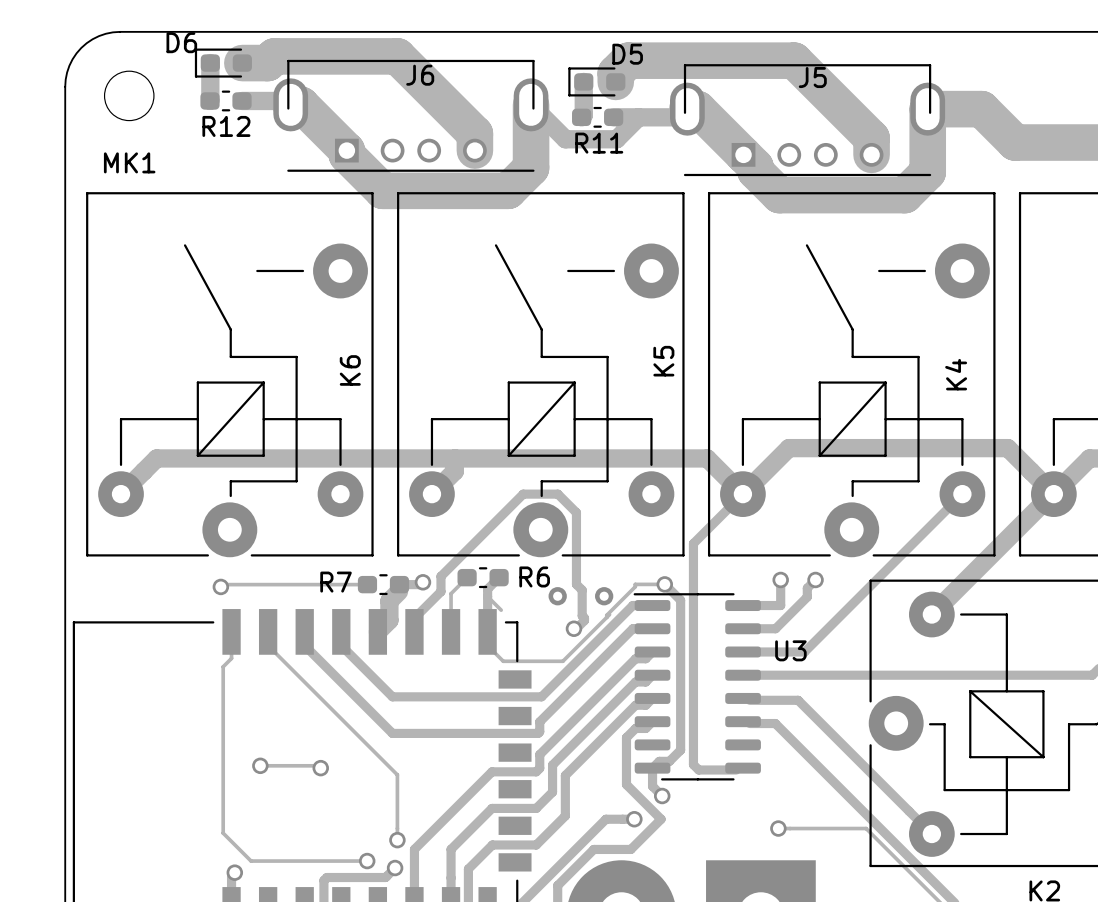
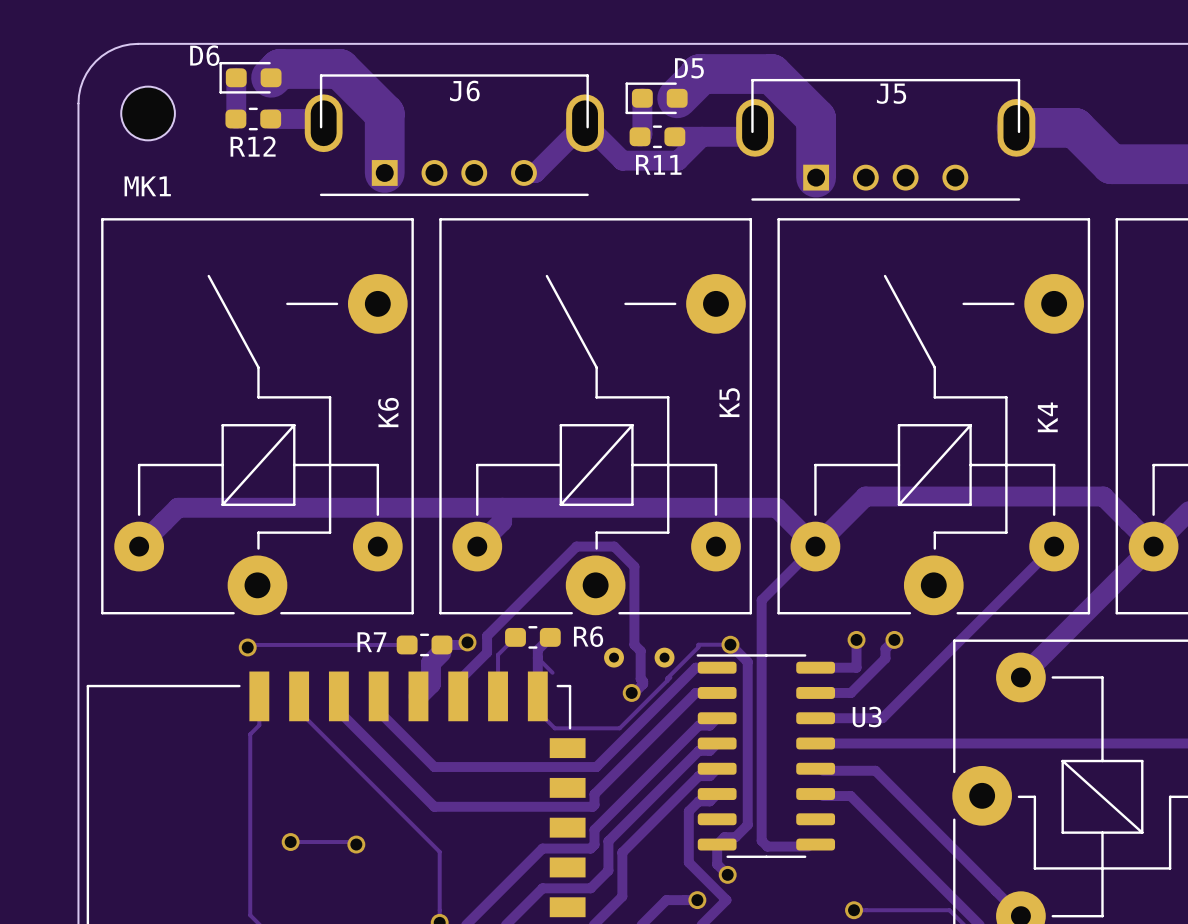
track: (242, 63) (267, 63) (274, 56) (397, 56) (474, 133) (474, 150) -> (271, 77) (279, 68) (339, 68) (384, 113) (384, 172)
track: none -> (690, 85) (677, 98) (699, 74) (771, 74) (816, 118) (816, 177)
track: (615, 81) (615, 73) (628, 60) (794, 60) (871, 138) (871, 154) -> none
track: (290, 104) (301, 104) (346, 150) (346, 154) (382, 190) (508, 190) (531, 167) (531, 104) -> (523, 172) (535, 172) (585, 123)
track: (687, 109) (697, 109) (755, 166) (755, 171) (779, 195) (904, 195) (927, 172) (927, 109) -> none

